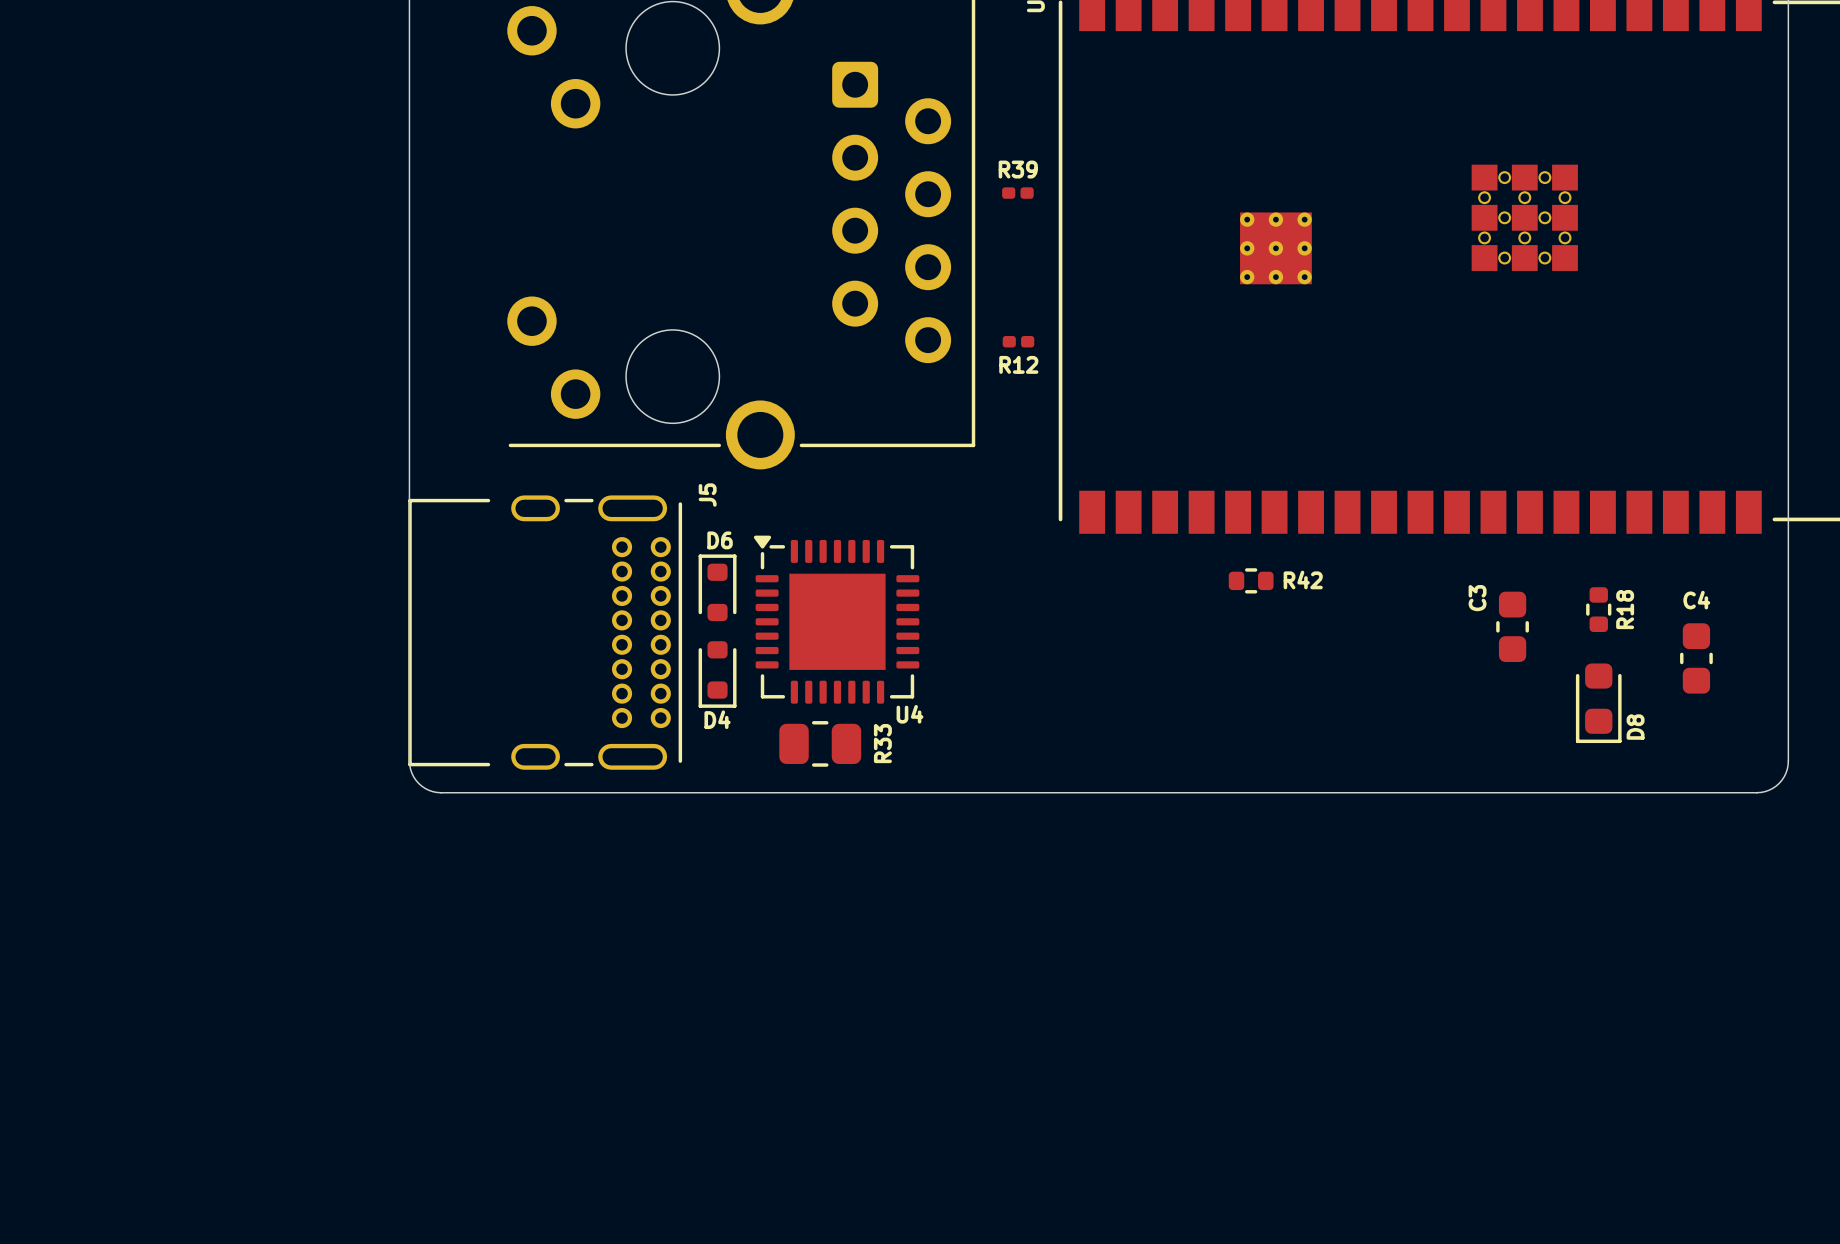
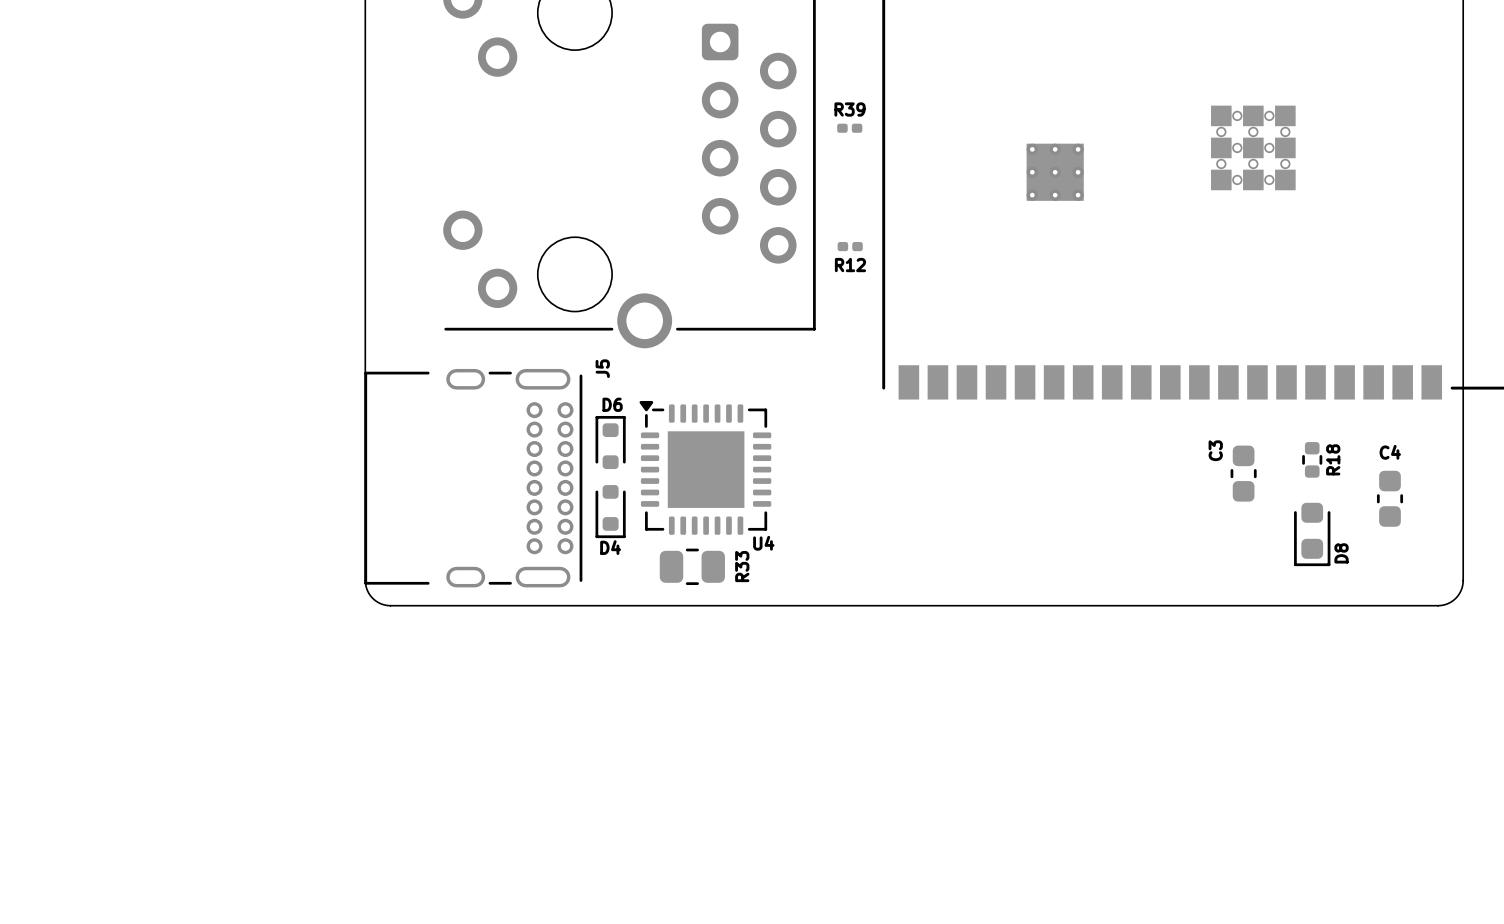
R42: (1251, 580) -> none

